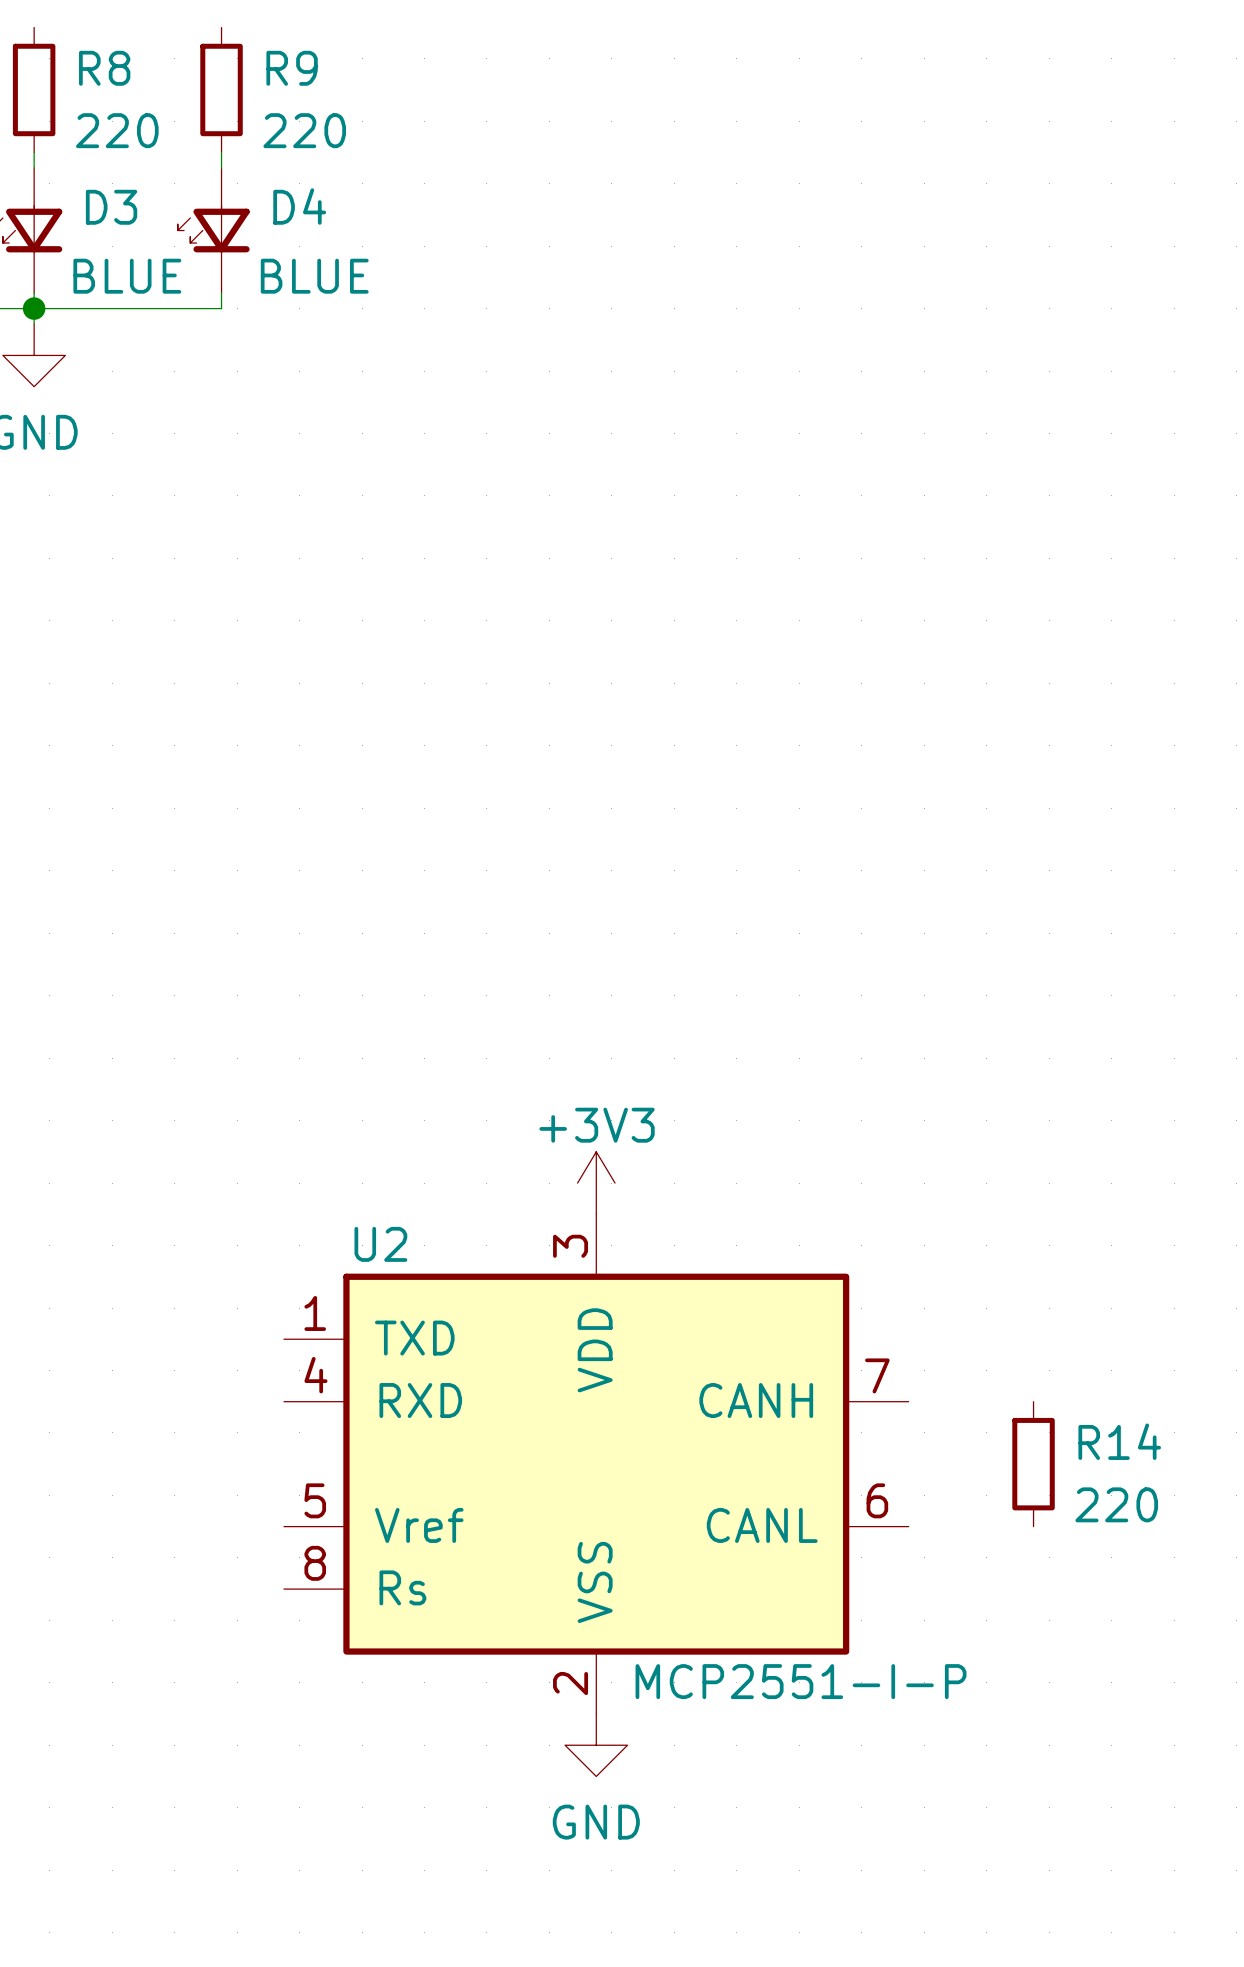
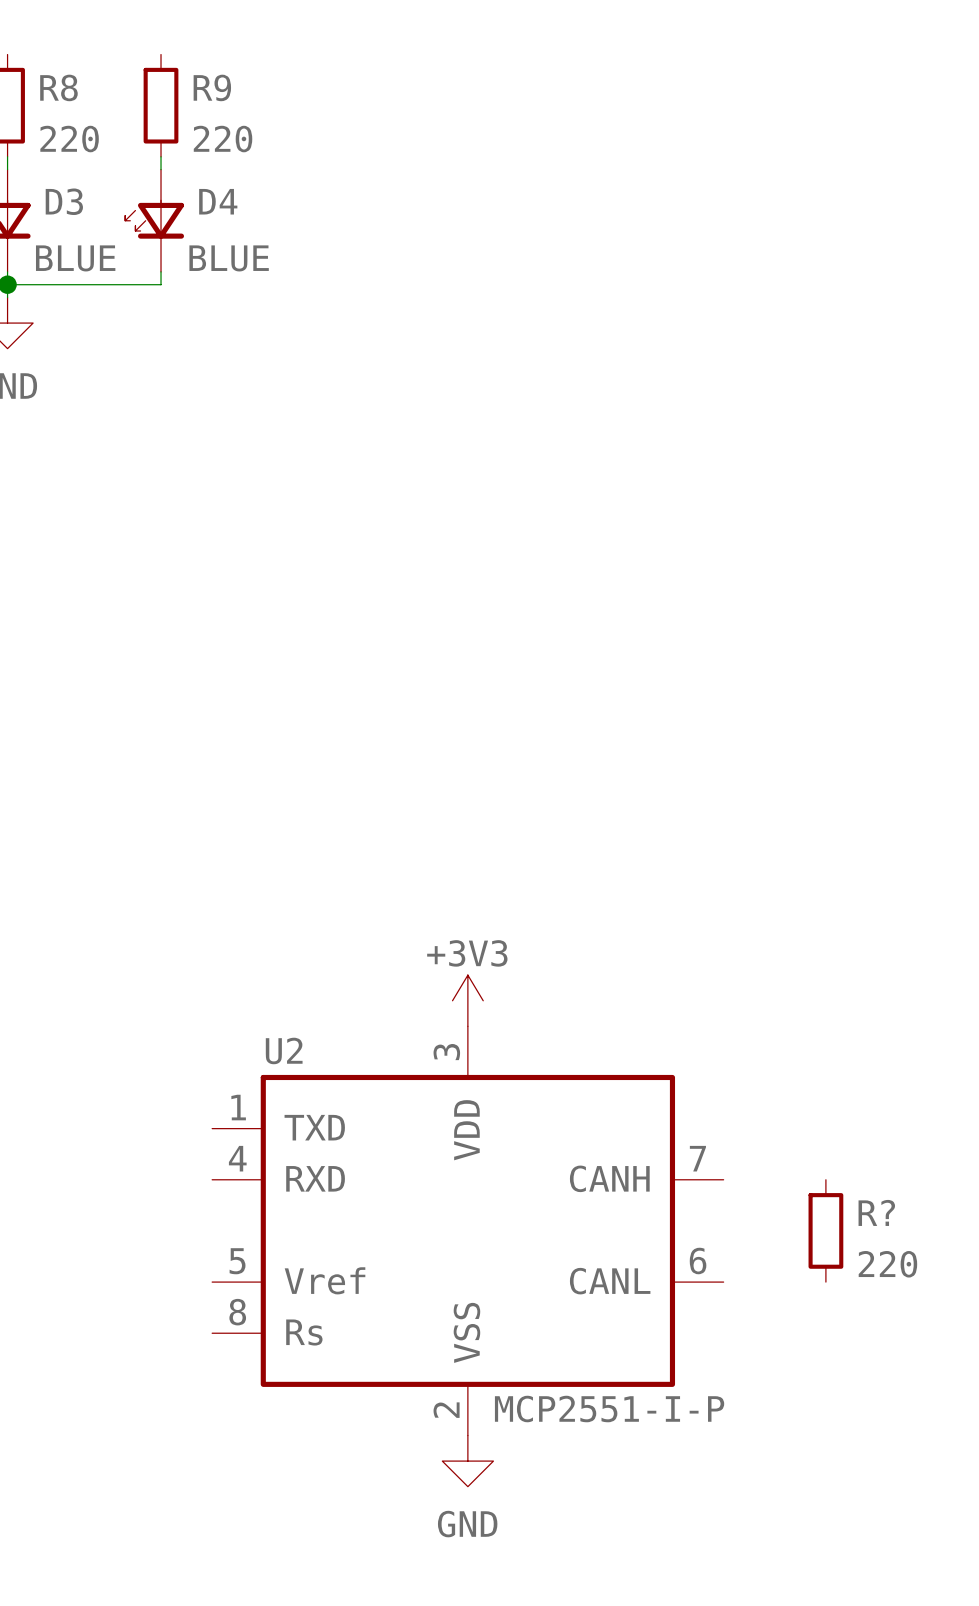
R14 name: R14 (1119, 1441) -> R? (876, 1212)

